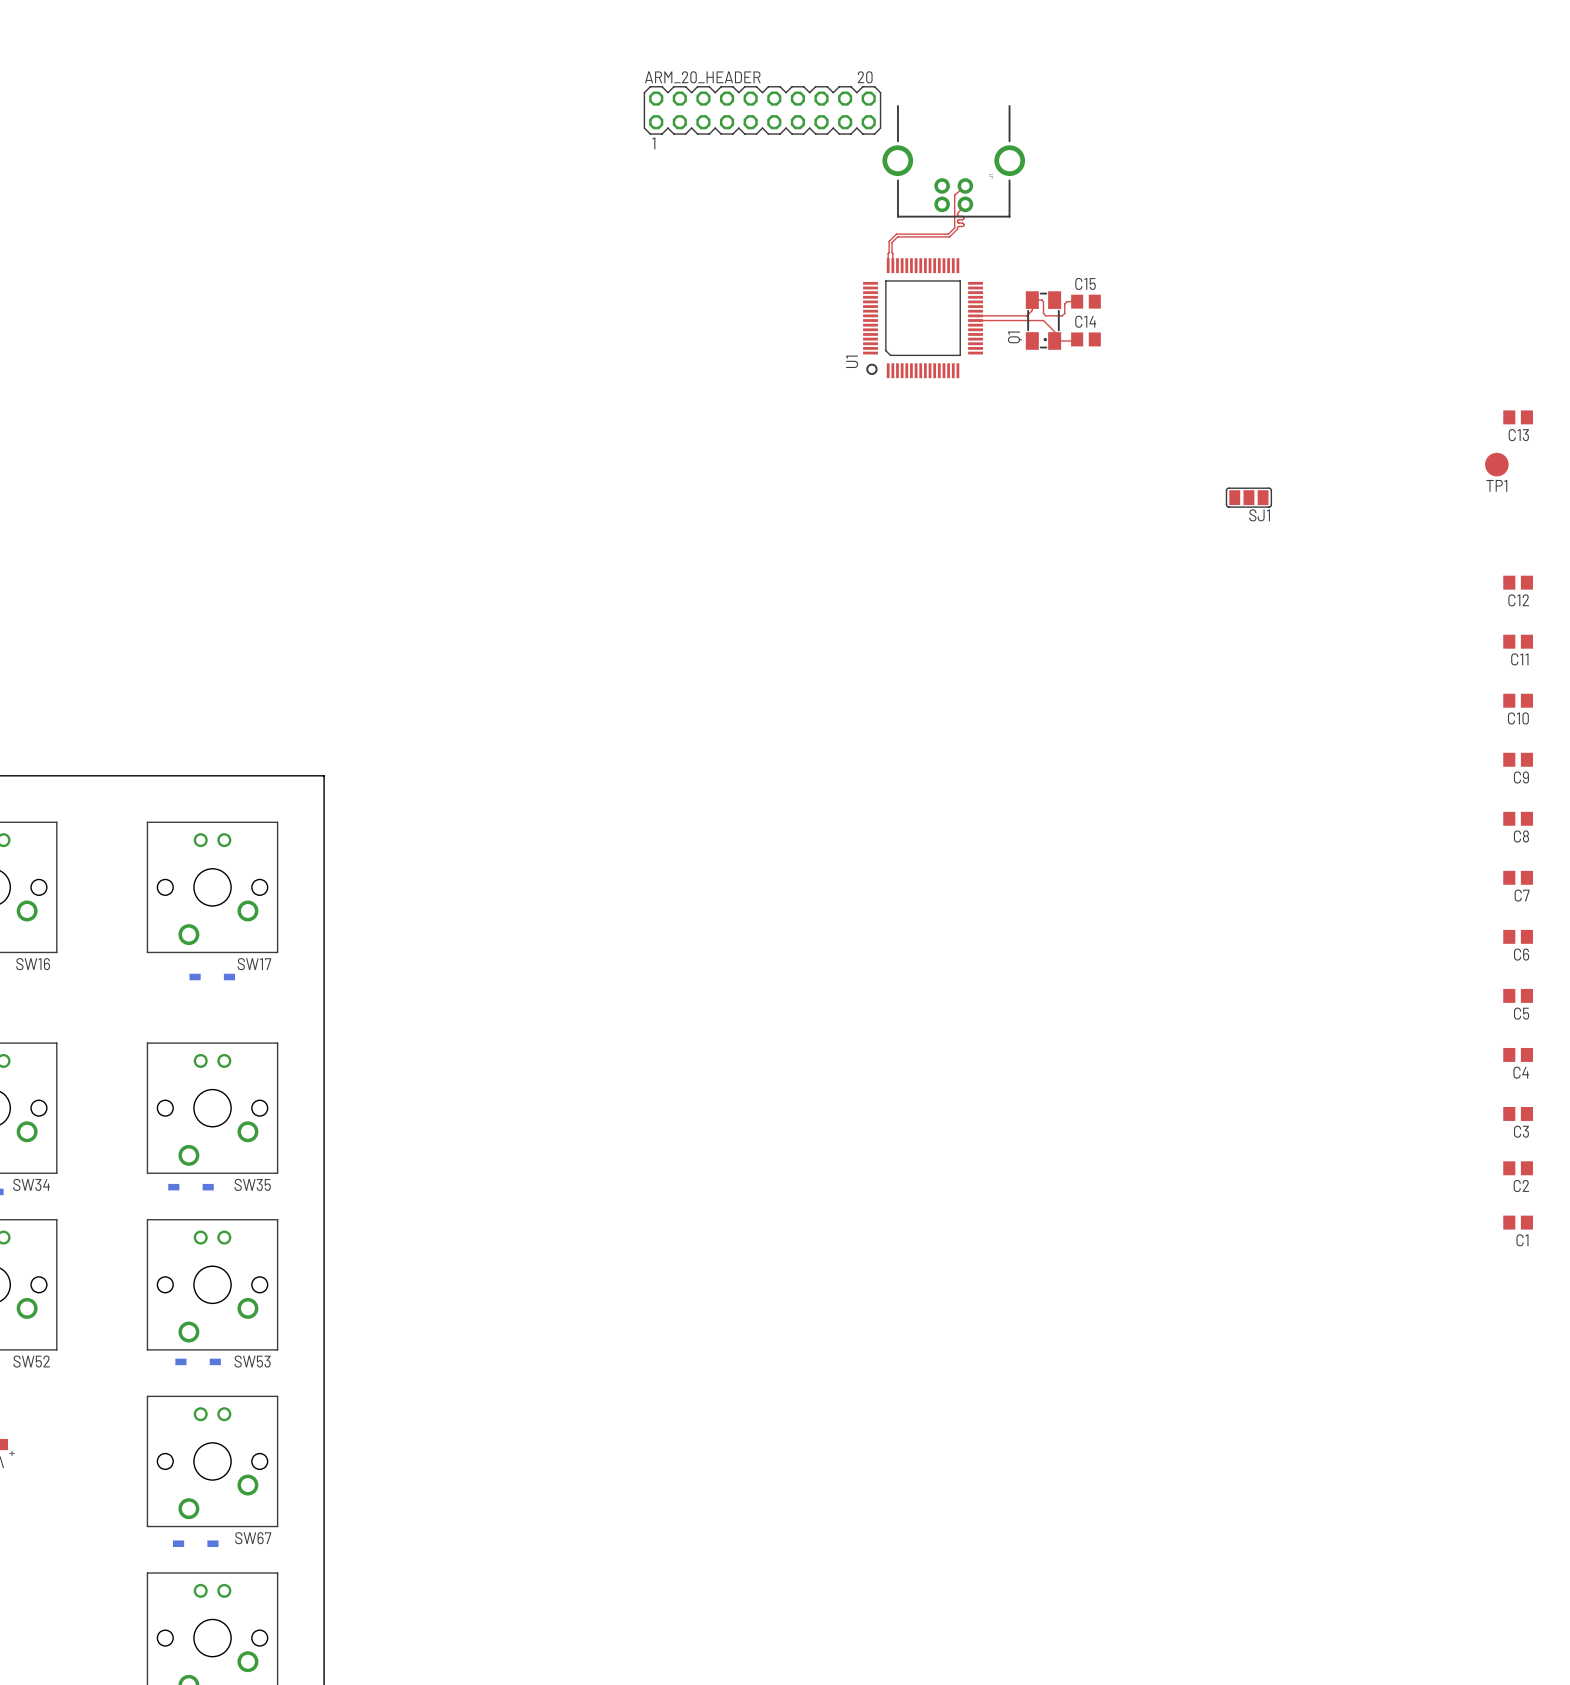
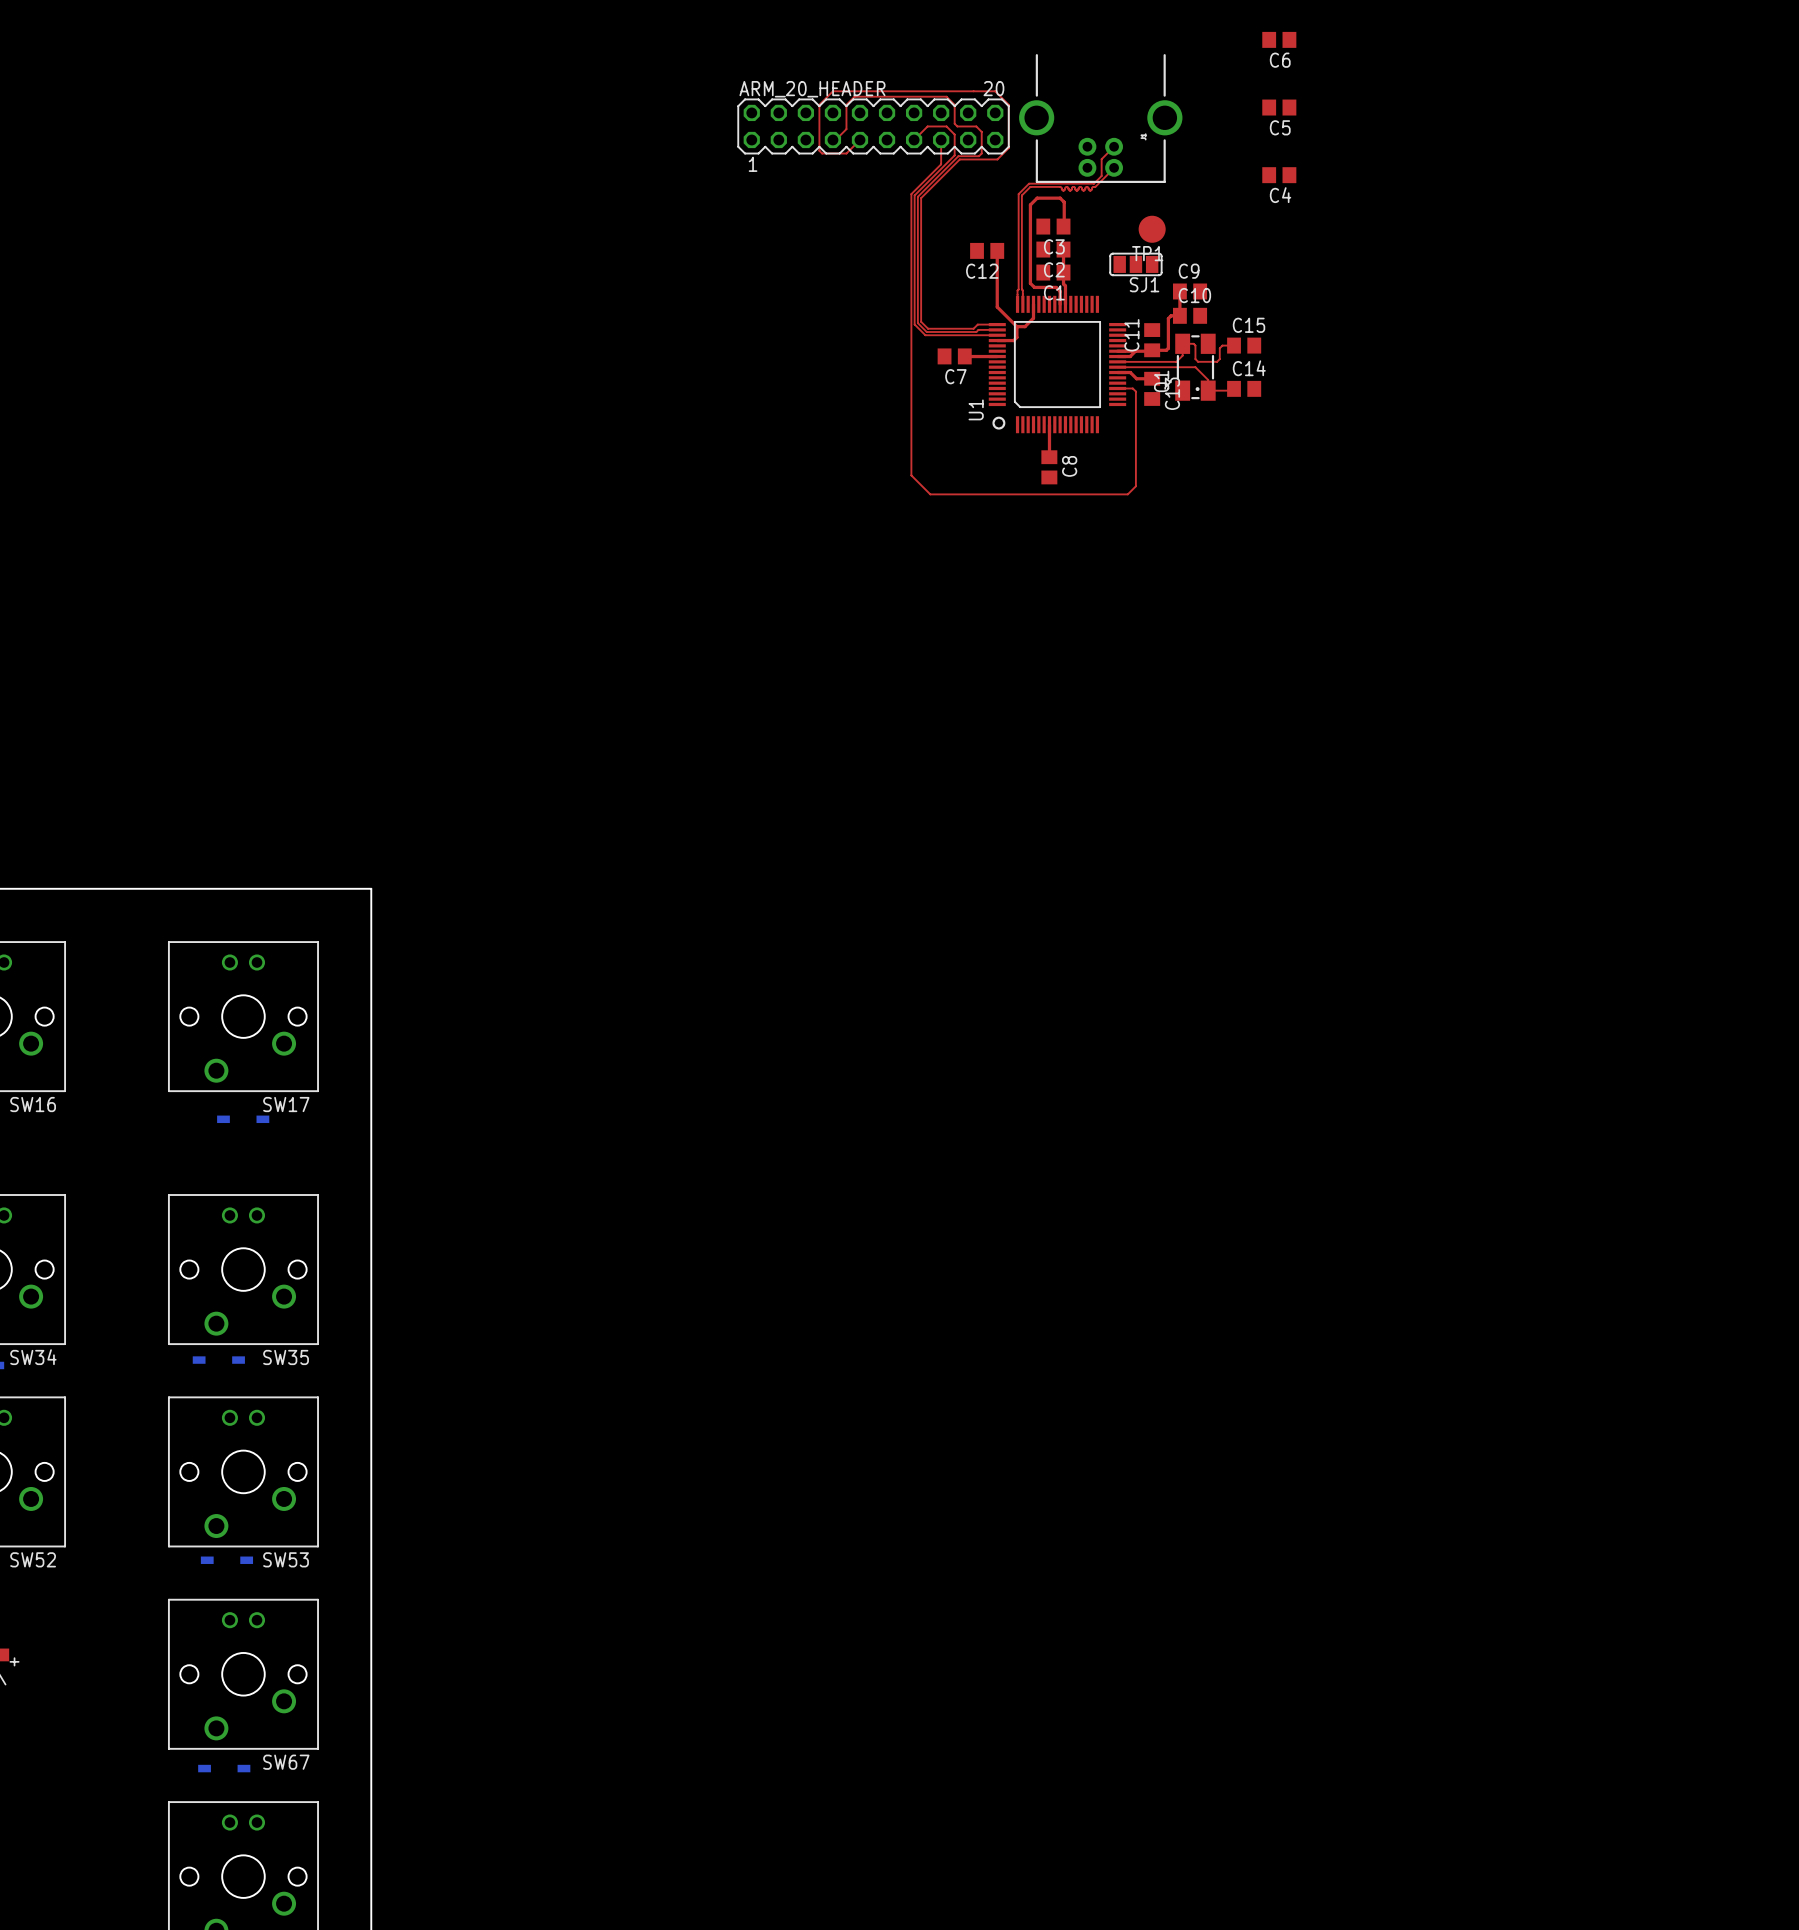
top track: none -> (832, 139) (835, 139) (846, 129) (846, 104) (854, 96) (946, 96) (954, 104) (954, 123) (957, 126) (976, 126) (981, 131) (981, 153) (979, 156) (958, 156) (917, 196) (917, 323) (926, 331) (997, 329)
top track: none -> (859, 139) (846, 153) (822, 153) (819, 150) (819, 104) (832, 91) (995, 91) (1008, 104) (1008, 148) (997, 159) (959, 159) (921, 198) (921, 321) (928, 328) (973, 328) (977, 324) (997, 324)
top track: none -> (914, 139) (927, 126) (946, 126) (954, 134) (954, 155) (914, 195) (914, 324) (925, 335) (997, 335)
top track: none -> (941, 139) (941, 164) (911, 194) (911, 475) (930, 494) (1127, 494) (1135, 486) (1135, 391) (1132, 388) (1117, 388)
top track: none -> (1114, 167) (1090, 190)
part position: (953, 161) -> (1100, 118)
top track: none -> (1066, 186) (1063, 190)
top track: none -> (1066, 186) (1070, 190)
top track: none -> (1073, 186) (1070, 190)
top track: none -> (1073, 186) (1076, 190)
top track: none -> (1080, 186) (1076, 190)
top track: none -> (1080, 186) (1083, 190)
top track: none -> (1086, 186) (1083, 190)
top track: none -> (1087, 186) (1090, 190)
top track: (965, 185) (954, 195) (954, 227) (948, 234) (896, 234) (889, 241) -> (1114, 146) (1101, 159) (1101, 176) (1094, 183) (1029, 183) (1018, 194) (1018, 276)
top track: none -> (1063, 226) (1064, 202) (1060, 198) (1037, 198) (1030, 204) (1030, 283) (1034, 287) (1056, 287) (1060, 291) (1060, 304)
top track: (965, 204) (957, 213) (958, 216) (963, 217) (958, 220) (957, 222) (963, 223) (963, 225) (958, 226) (949, 236) (897, 236) (892, 242) -> (1063, 190) (1060, 186) (1030, 186) (1021, 195) (1021, 277)
top track: none -> (1063, 249) (1065, 304)
top track: none -> (997, 250) (997, 307) (1016, 326)
top track: none -> (1179, 291) (1179, 315) (1171, 315) (1168, 318) (1168, 348) (1166, 350) (1117, 351)
top track: none -> (1033, 304) (1033, 318) (1025, 326) (1016, 326)
top track: none -> (1016, 326) (1016, 337) (1013, 340) (997, 340)
top track: none -> (1135, 351) (1130, 356) (1117, 356)
top track: none -> (964, 356) (997, 356)
top track: none -> (1117, 372) (1130, 372) (1136, 378) (1152, 378)
top track: none -> (1049, 424) (1049, 457)
C13 rotation: 0° (1518, 417) -> 90° clockwise (1152, 388)
C13 position: (1518, 417) -> (1152, 388)
C13 name position: C13 (1518, 435) -> C13 (1172, 393)
TP1 position: (1496, 464) -> (1152, 229)
SJ1 position: (1248, 497) -> (1135, 264)
C12 position: (1518, 582) -> (987, 250)
C11 rotation: 0° (1518, 641) -> 90° clockwise (1152, 340)
C11 position: (1518, 641) -> (1152, 340)
C10 position: (1518, 700) -> (1190, 315)
C10 name position: C10 (1518, 718) -> C10 (1194, 295)
C9 position: (1518, 759) -> (1190, 291)
C9 name position: C9 (1521, 777) -> C9 (1189, 271)
C8 rotation: 0° (1518, 818) -> 90° clockwise (1049, 467)
C8 position: (1518, 818) -> (1049, 467)
C8 name position: C8 (1521, 836) -> C8 (1069, 466)
C7 position: (1518, 877) -> (954, 356)
C6 position: (1518, 936) -> (1279, 39)
C5 position: (1518, 995) -> (1279, 107)
C4 position: (1518, 1054) -> (1279, 175)
C3 position: (1518, 1113) -> (1053, 226)
C2 position: (1518, 1168) -> (1053, 249)
C1 position: (1518, 1222) -> (1053, 272)

